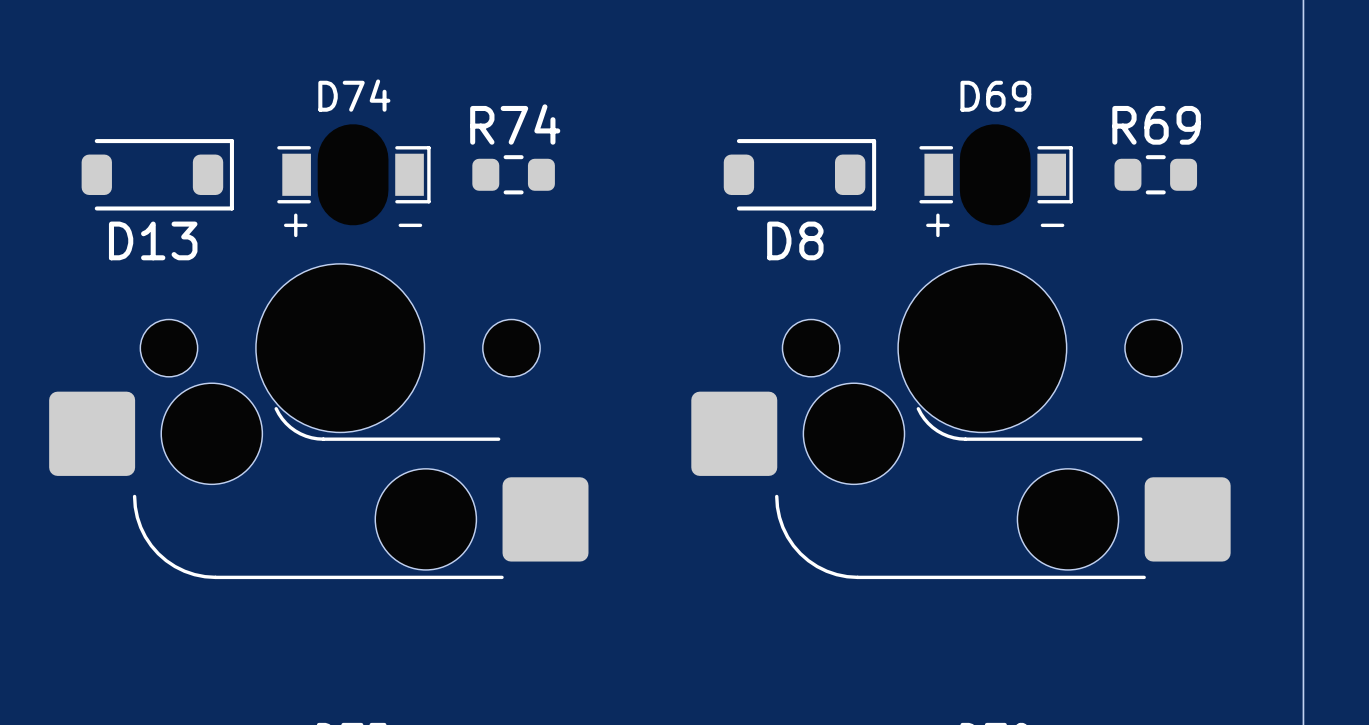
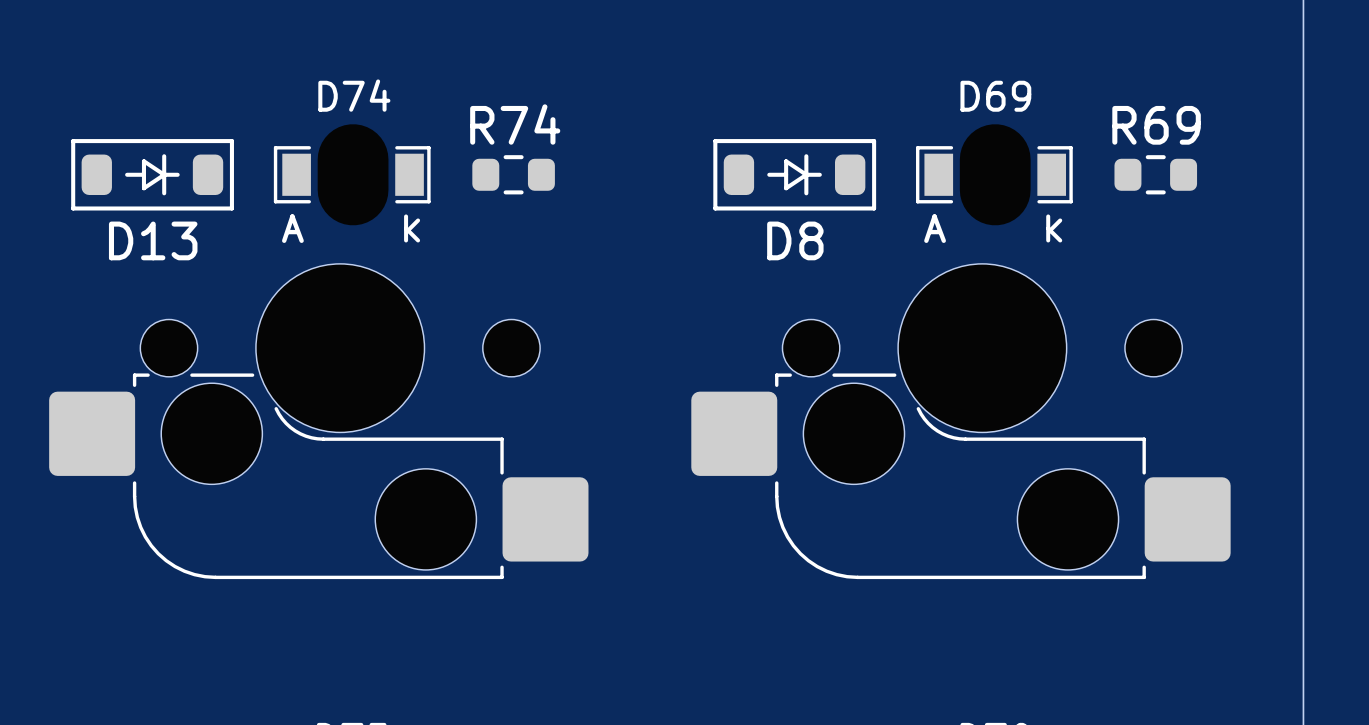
D74 footprint: [277, 124, 431, 238] -> [273, 124, 431, 243]
D69 footprint: [919, 124, 1073, 238] -> [916, 124, 1073, 243]
D13 footprint: [81, 139, 234, 211] -> [71, 139, 234, 211]
D8 footprint: [723, 139, 877, 211] -> [713, 139, 877, 211]
part footprint: [49, 263, 589, 580] -> [49, 263, 589, 580]
part footprint: [691, 263, 1231, 580] -> [691, 263, 1231, 580]

